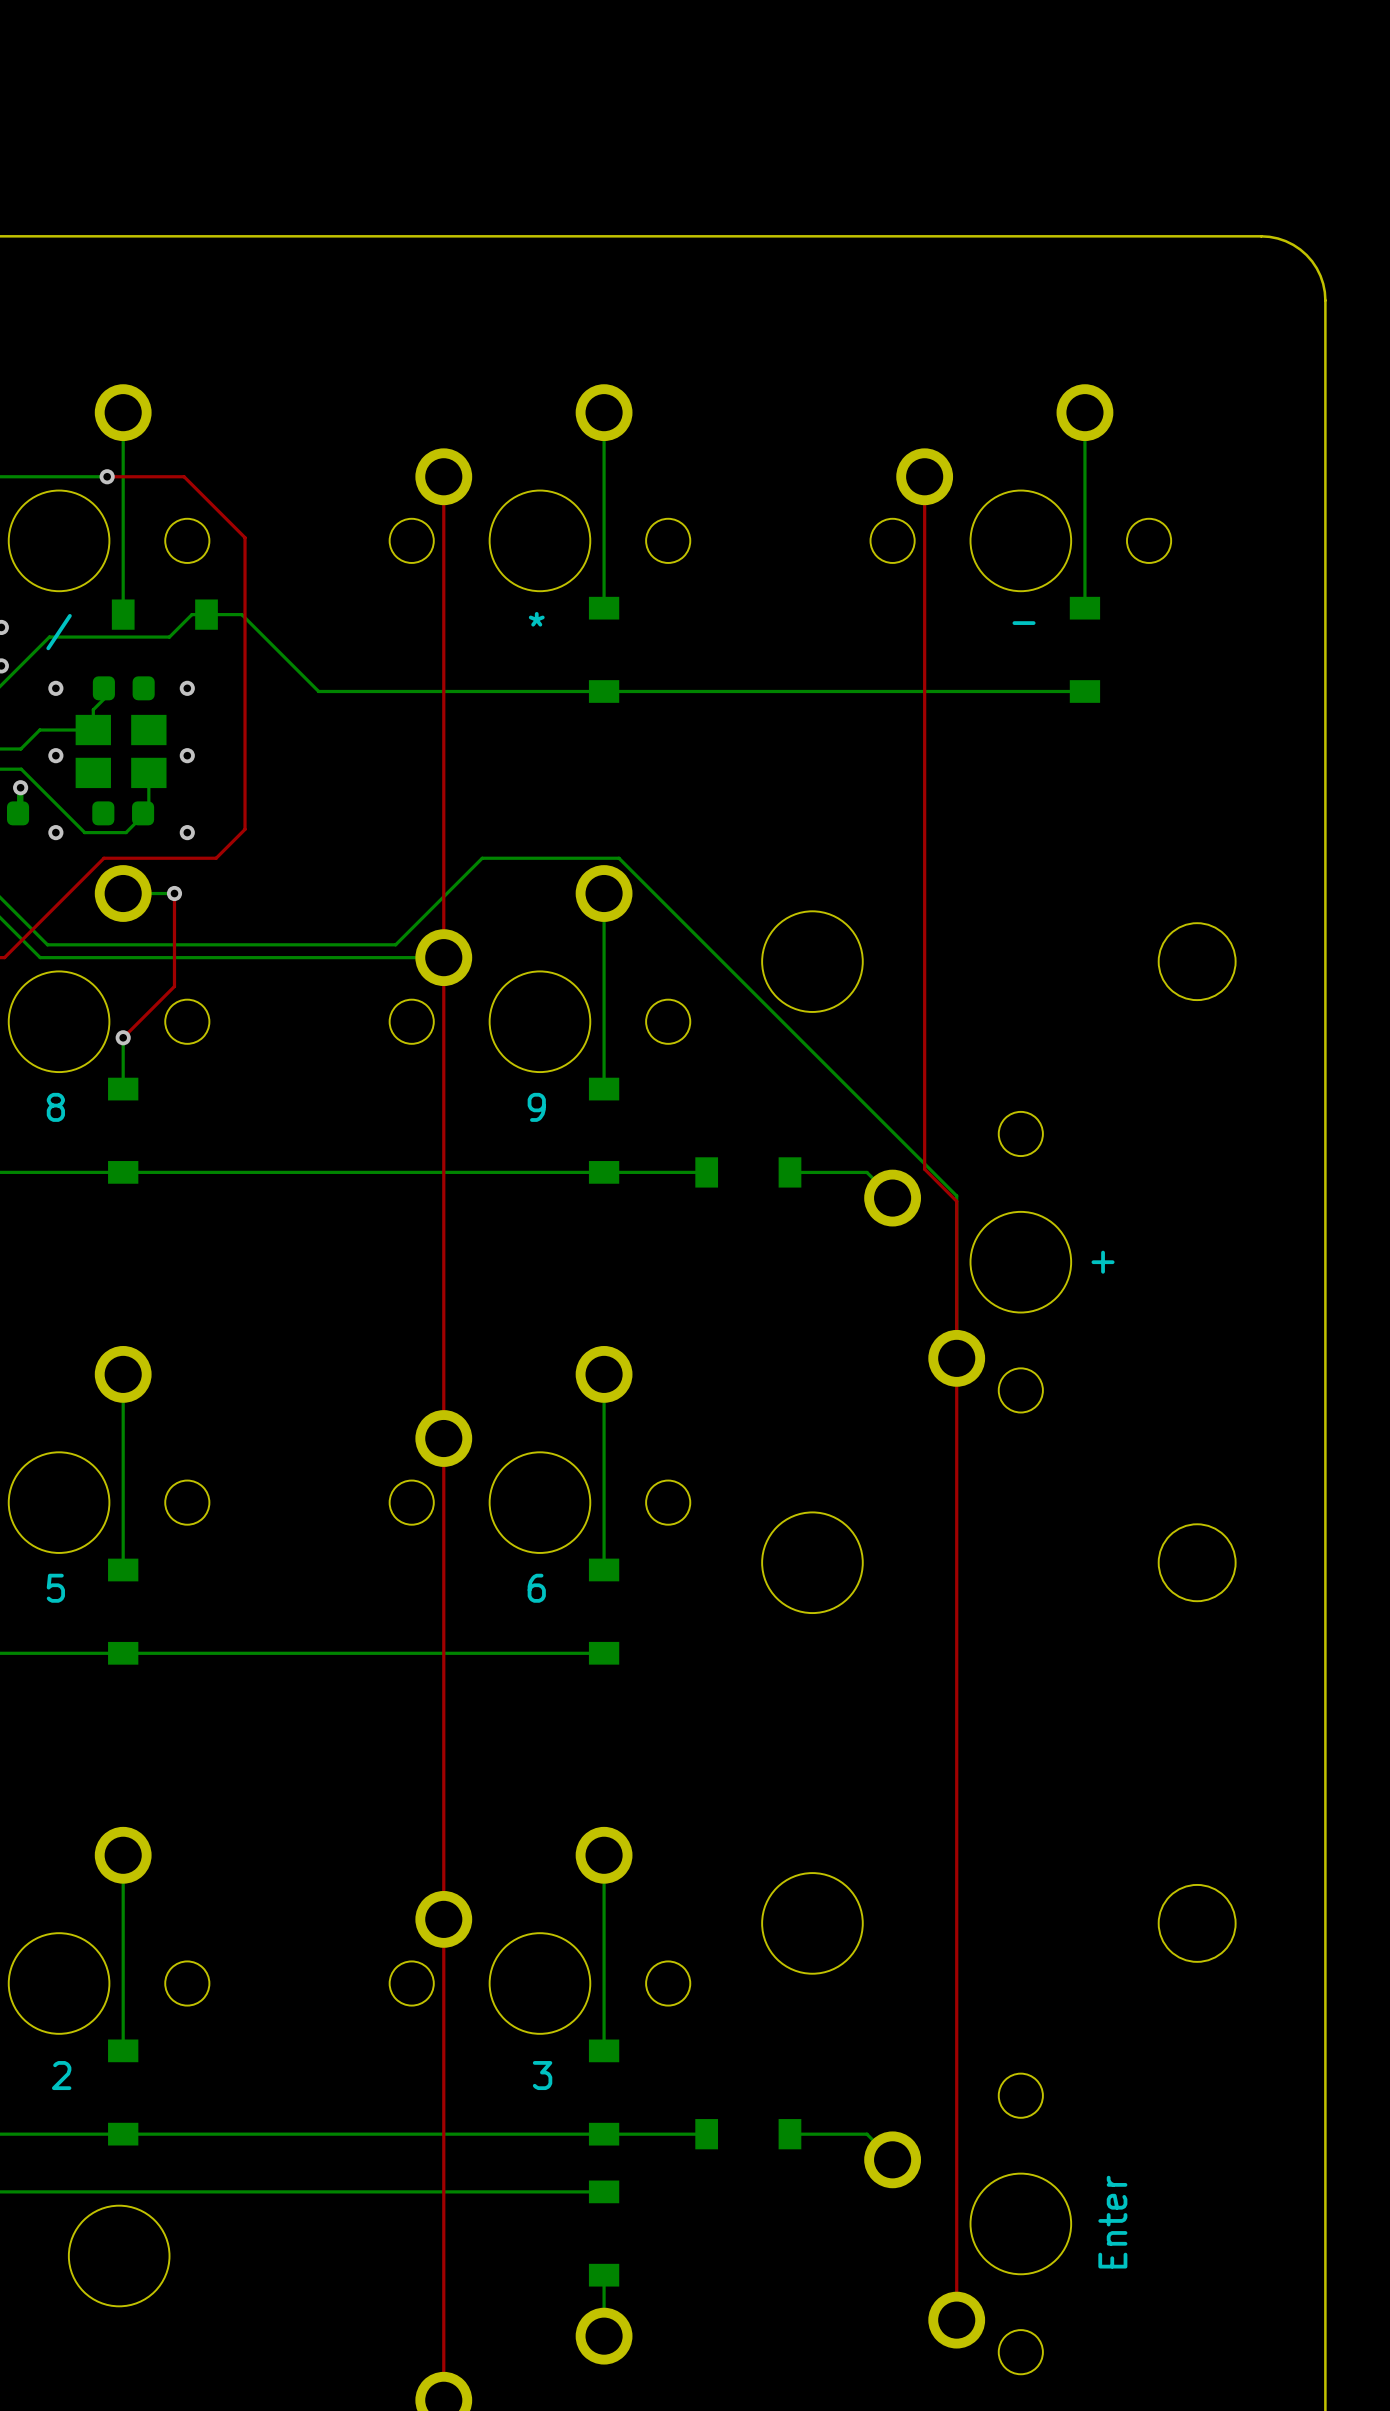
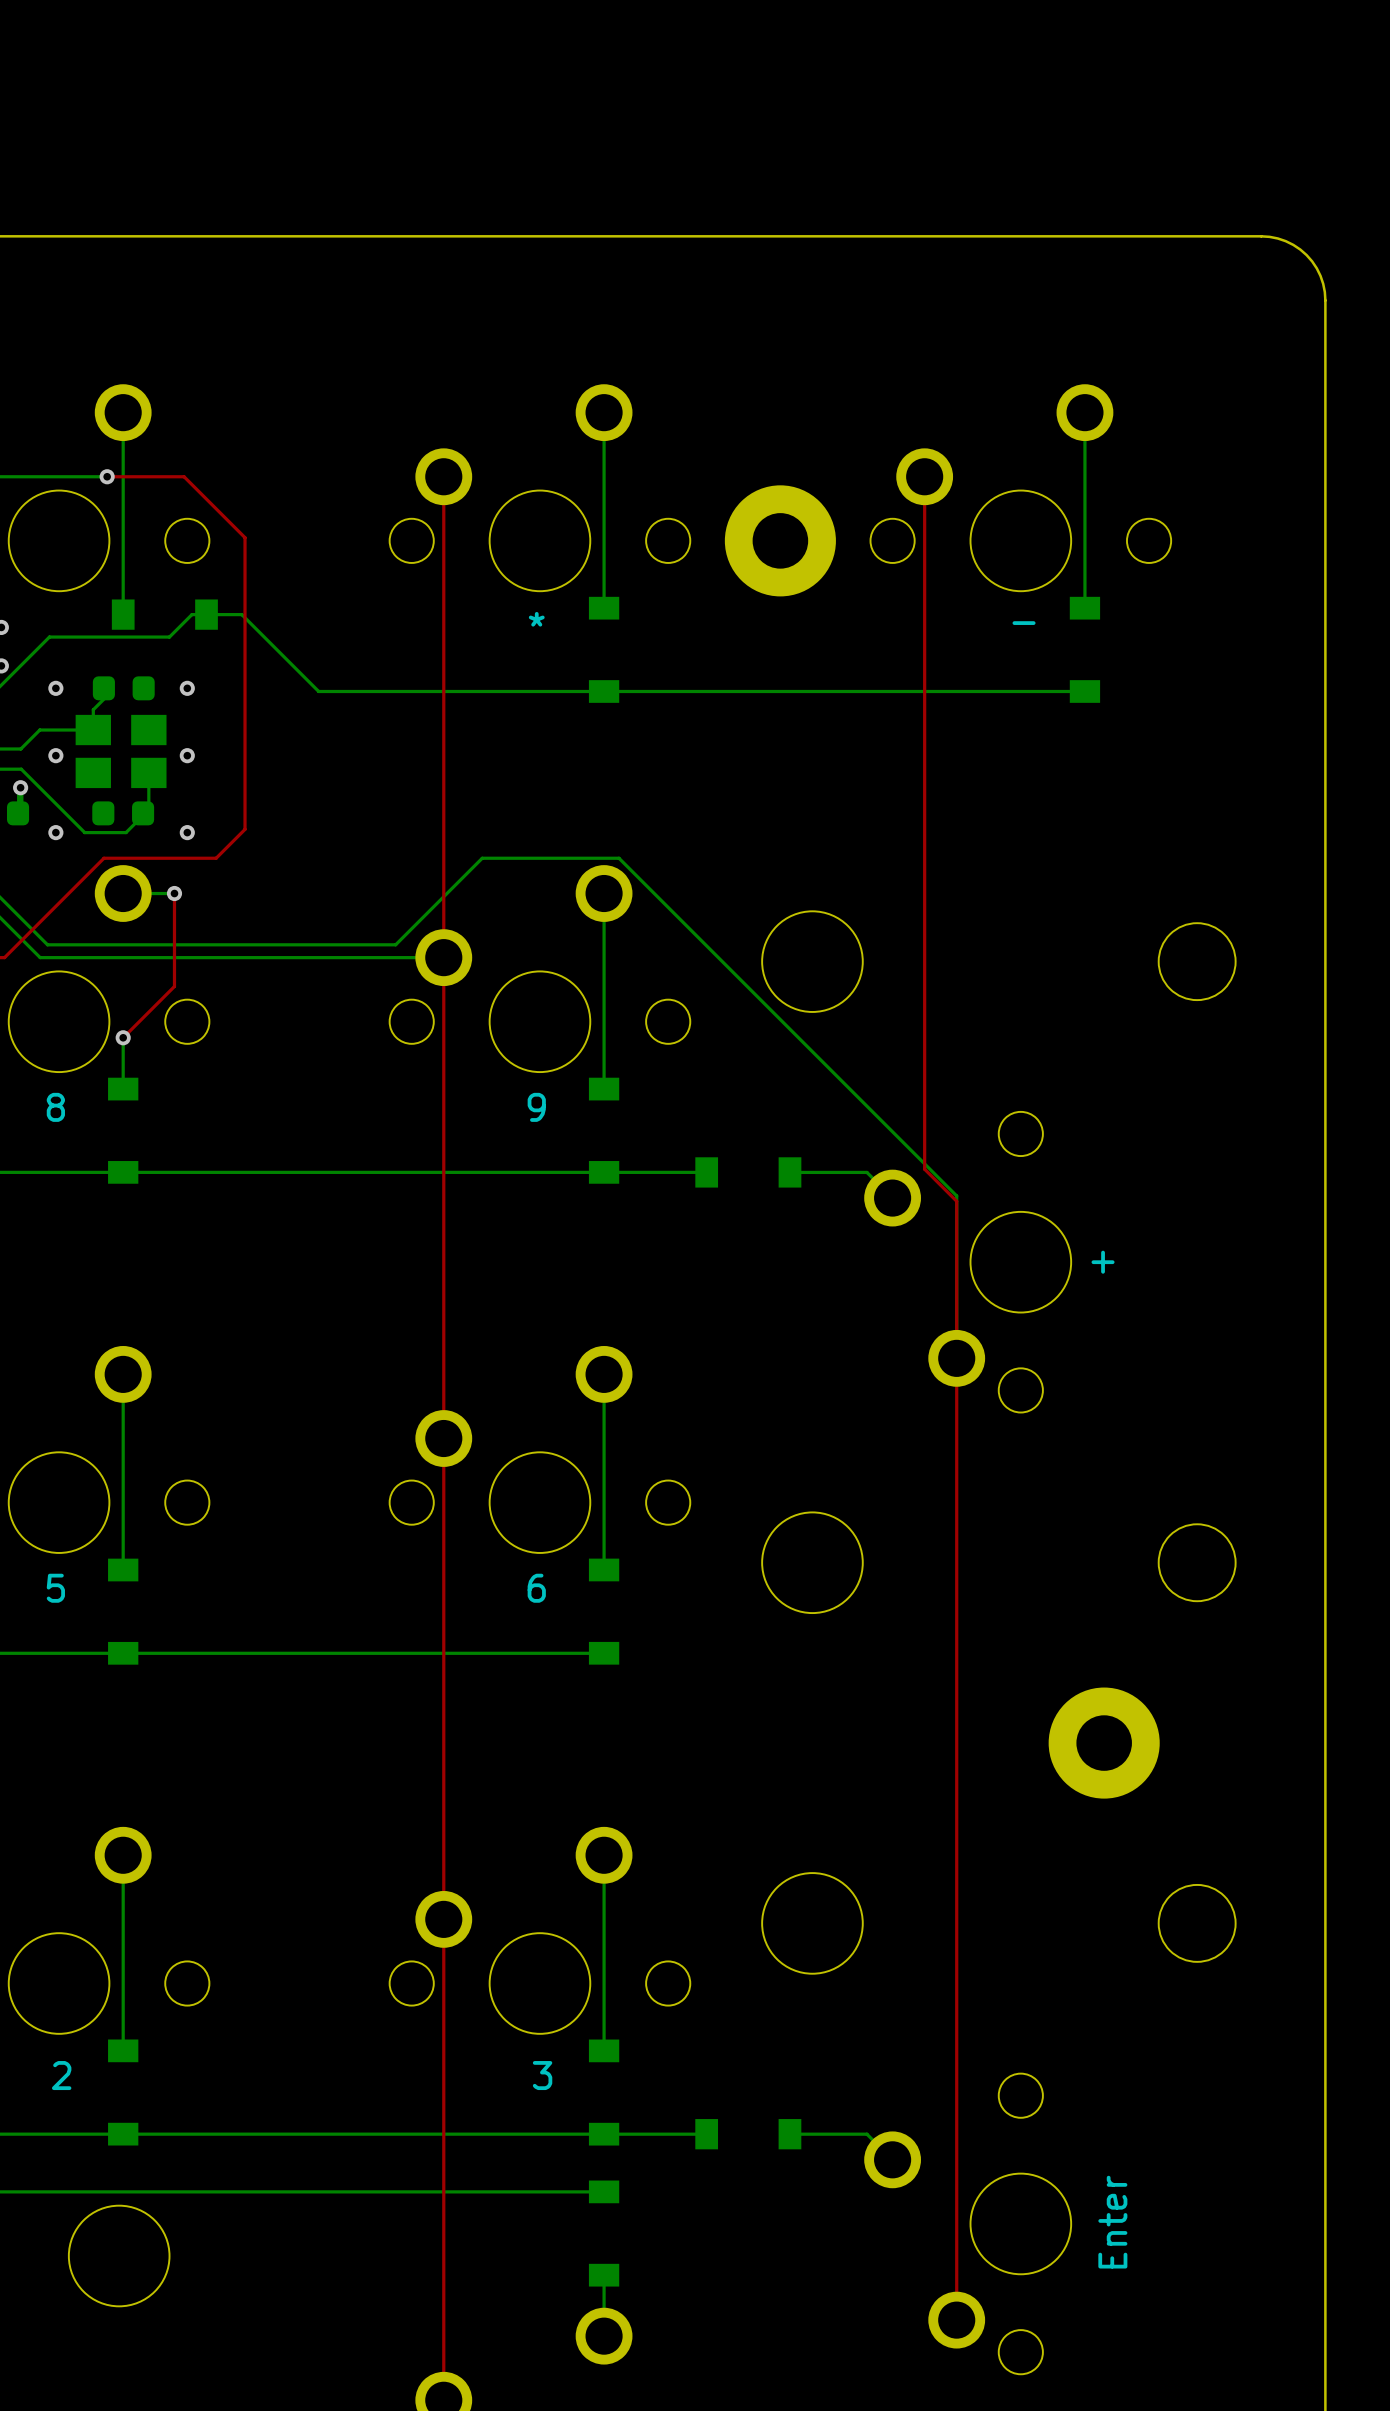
part: none -> (780, 540)
text: / (59, 632) -> none
part: none -> (1104, 1743)

